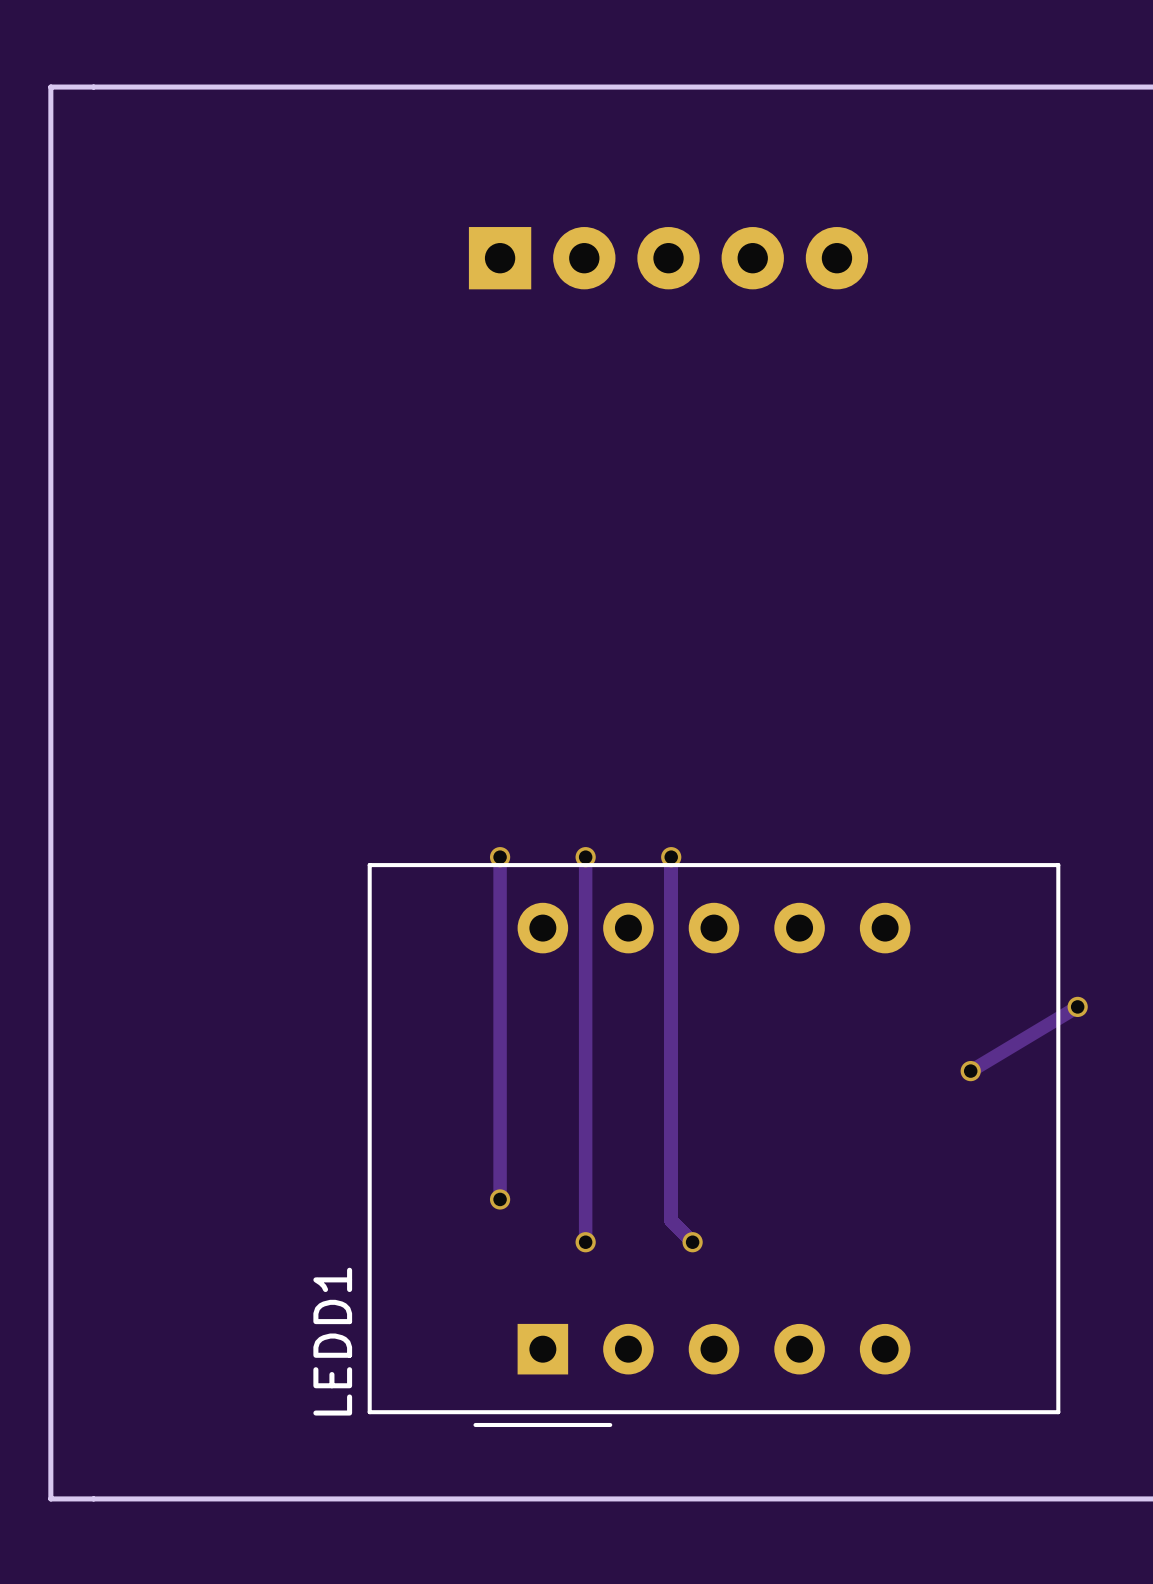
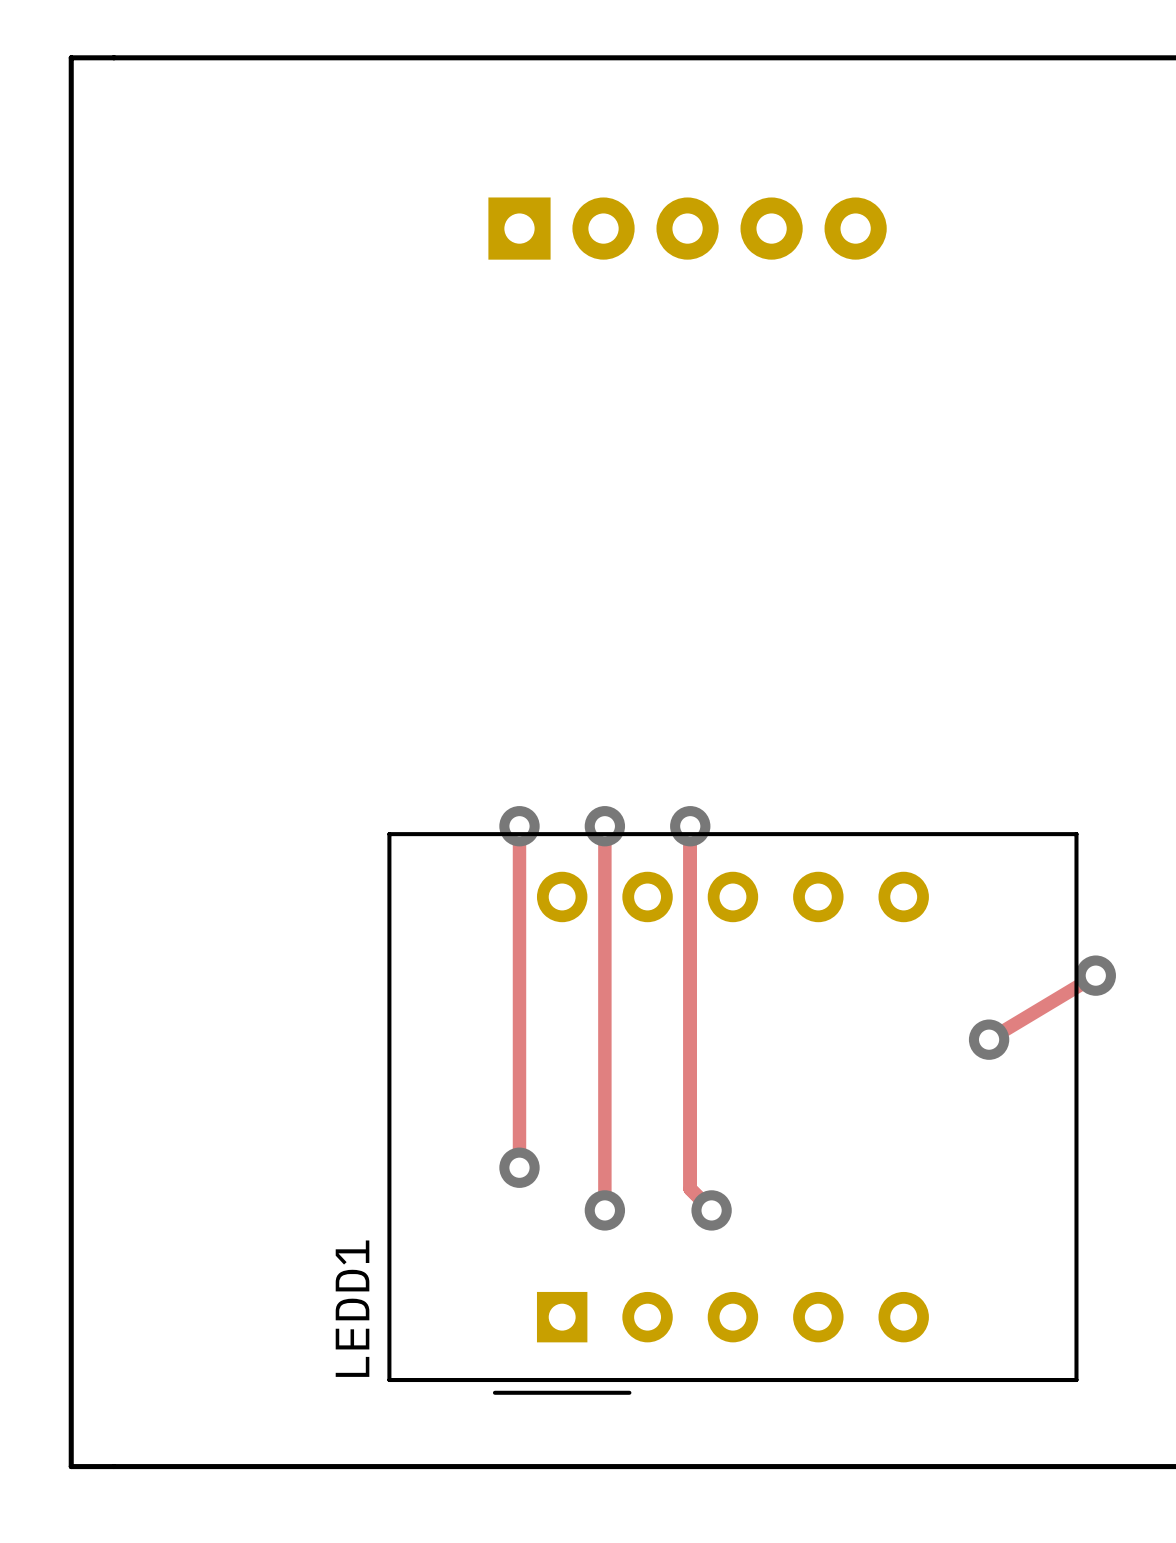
via size: [489, 847, 511, 868] -> [499, 806, 540, 847]
via size: [575, 847, 596, 868] -> [584, 806, 626, 847]
via size: [661, 847, 682, 868] -> [670, 806, 711, 847]
via size: [1067, 996, 1088, 1018] -> [1075, 955, 1116, 996]
via size: [960, 1060, 981, 1082] -> [968, 1019, 1010, 1060]
via size: [489, 1189, 511, 1210] -> [499, 1147, 540, 1188]
via size: [575, 1232, 596, 1253] -> [584, 1190, 626, 1231]
via size: [682, 1232, 703, 1253] -> [691, 1190, 732, 1231]

